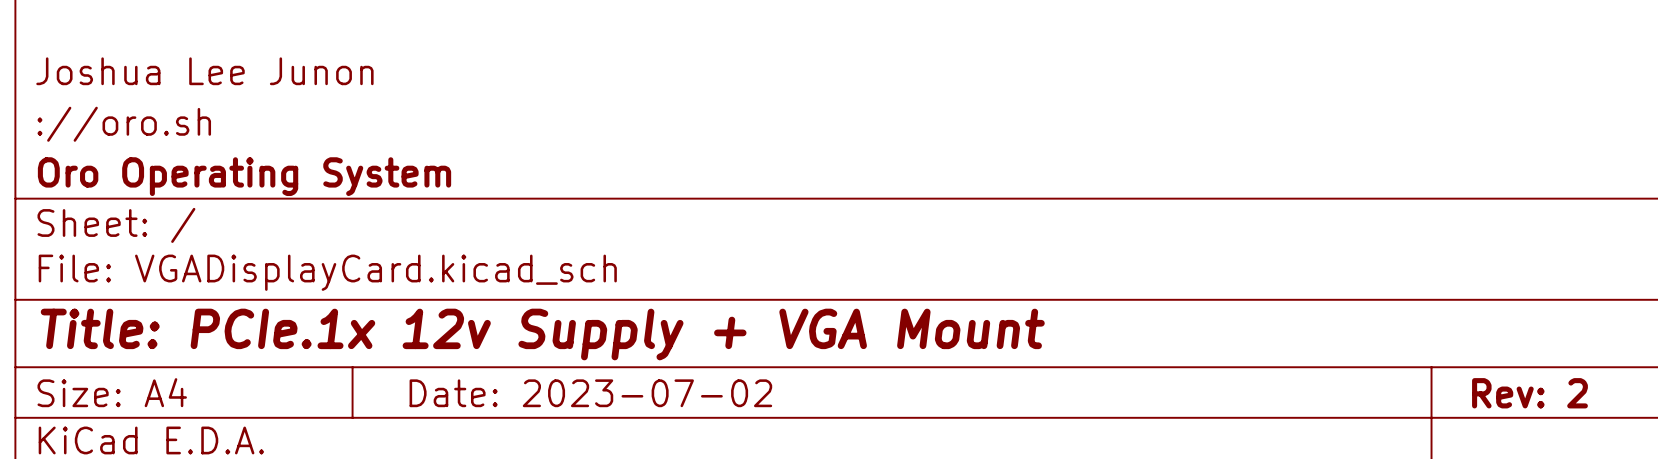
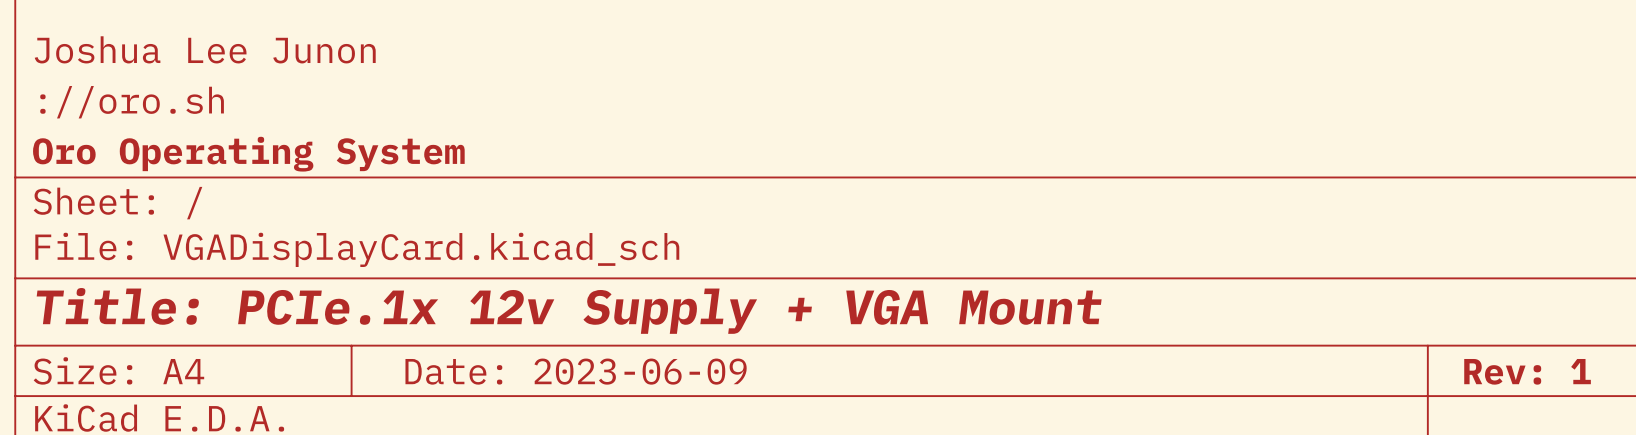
title block: Date: 2023-07-02 (590, 393) -> Date: 2023-06-09 (576, 371)
title block: Rev: 2 (1529, 393) -> Rev: 1 (1527, 371)

